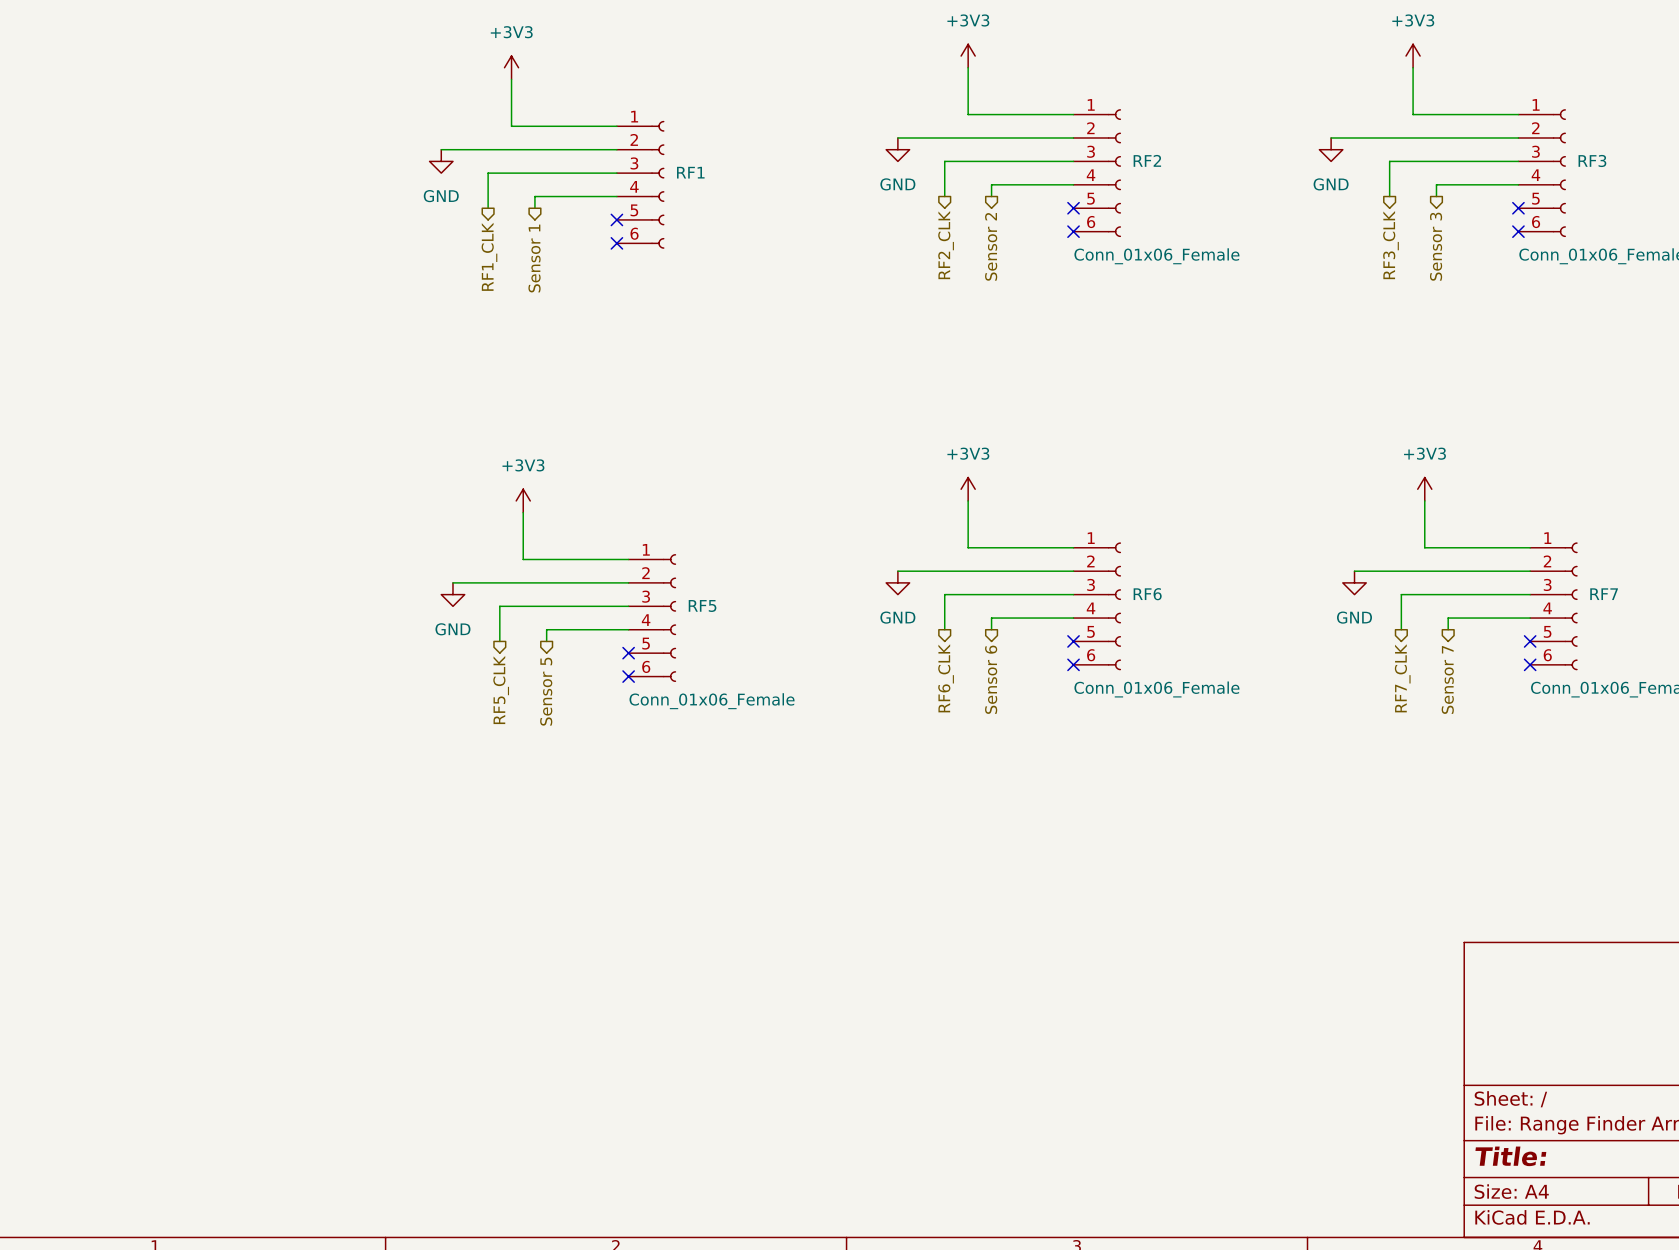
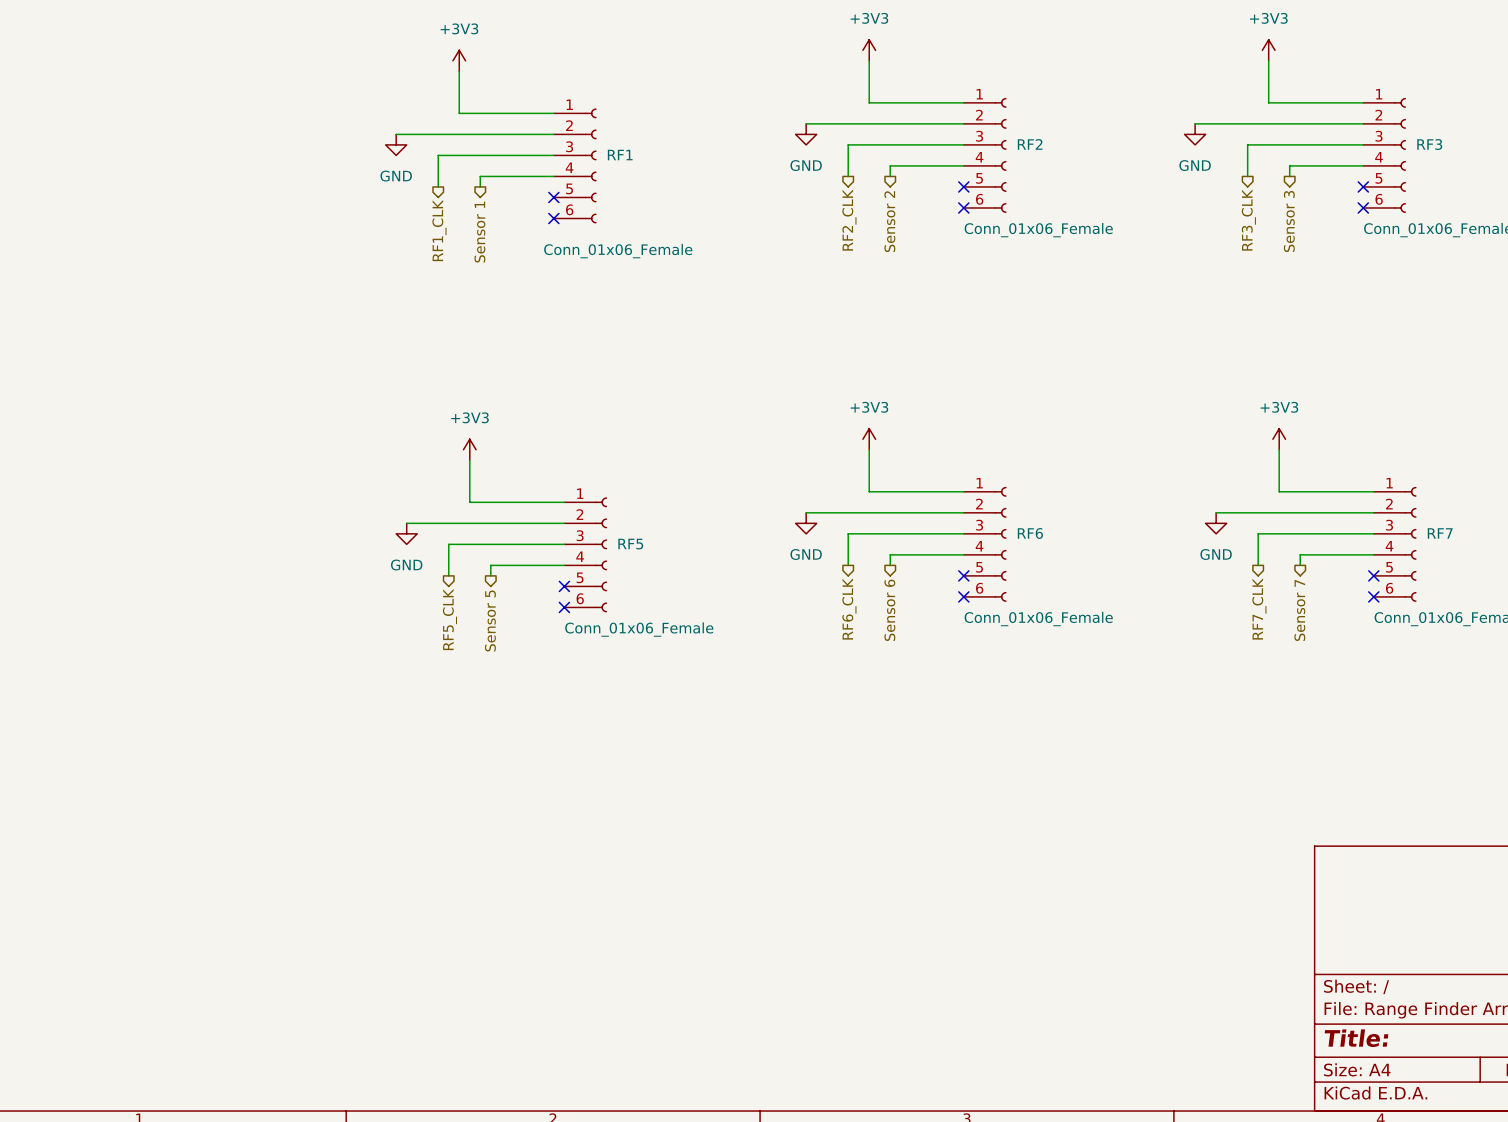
RF1 value: none -> Conn_01x06_Female (618, 251)

